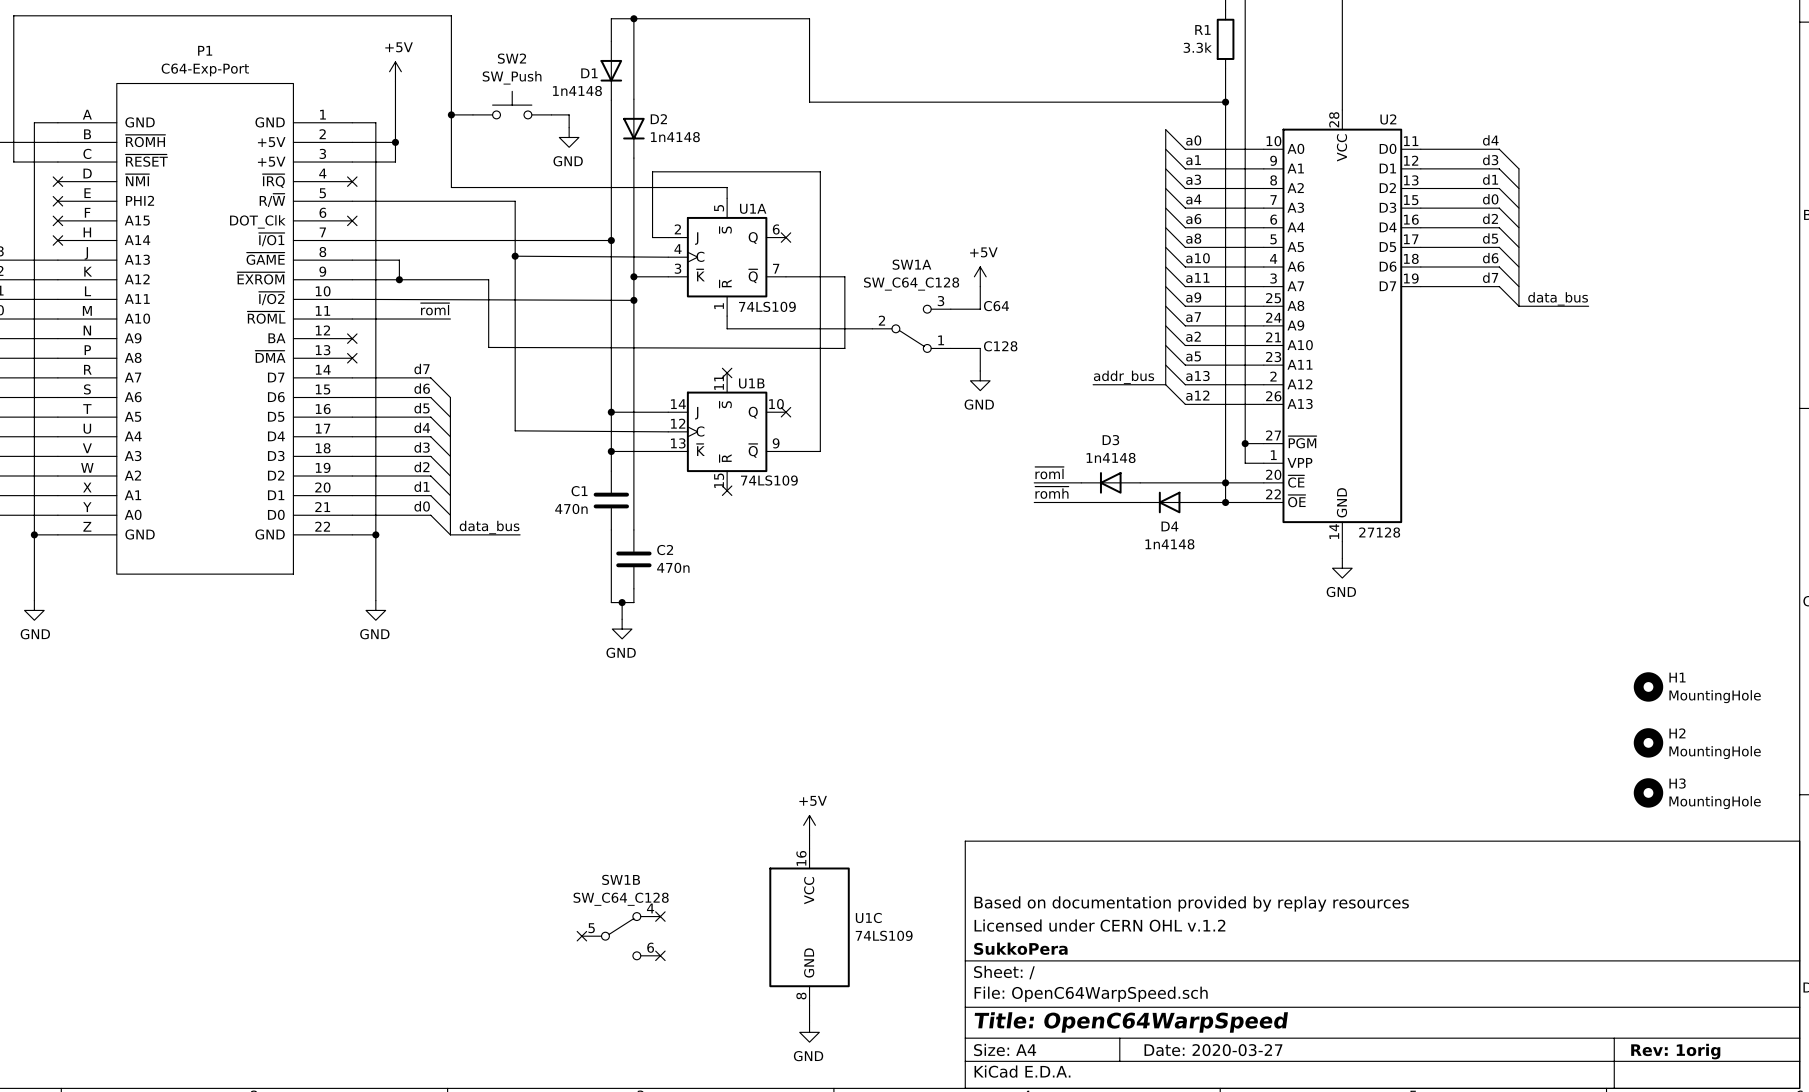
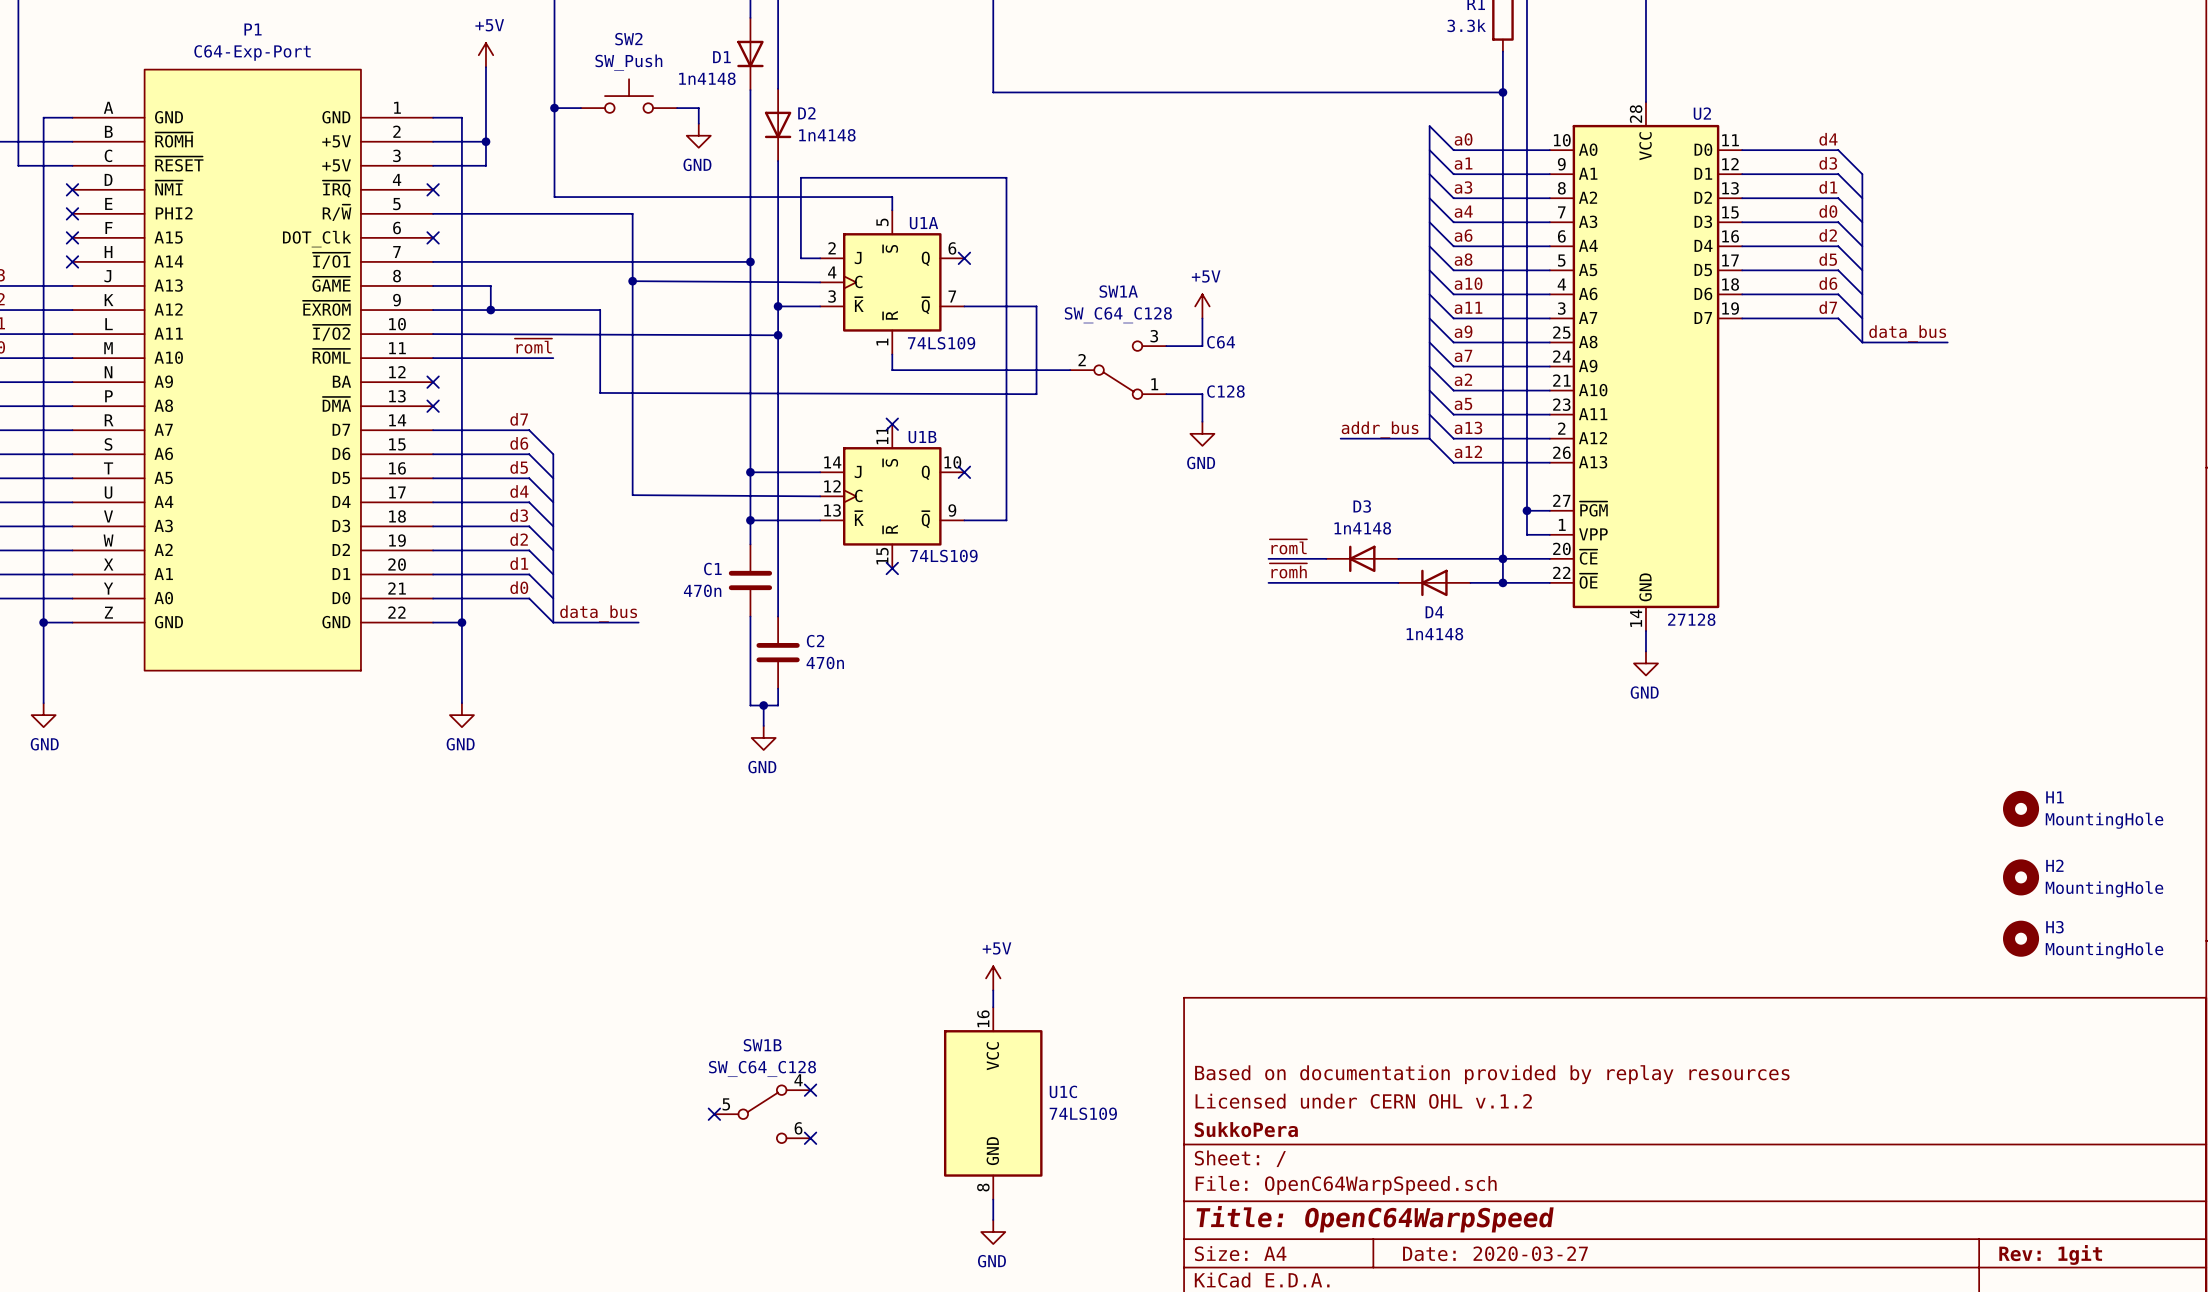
title block: Rev: 1orig (1675, 1051) -> Rev: 1git (2050, 1254)

